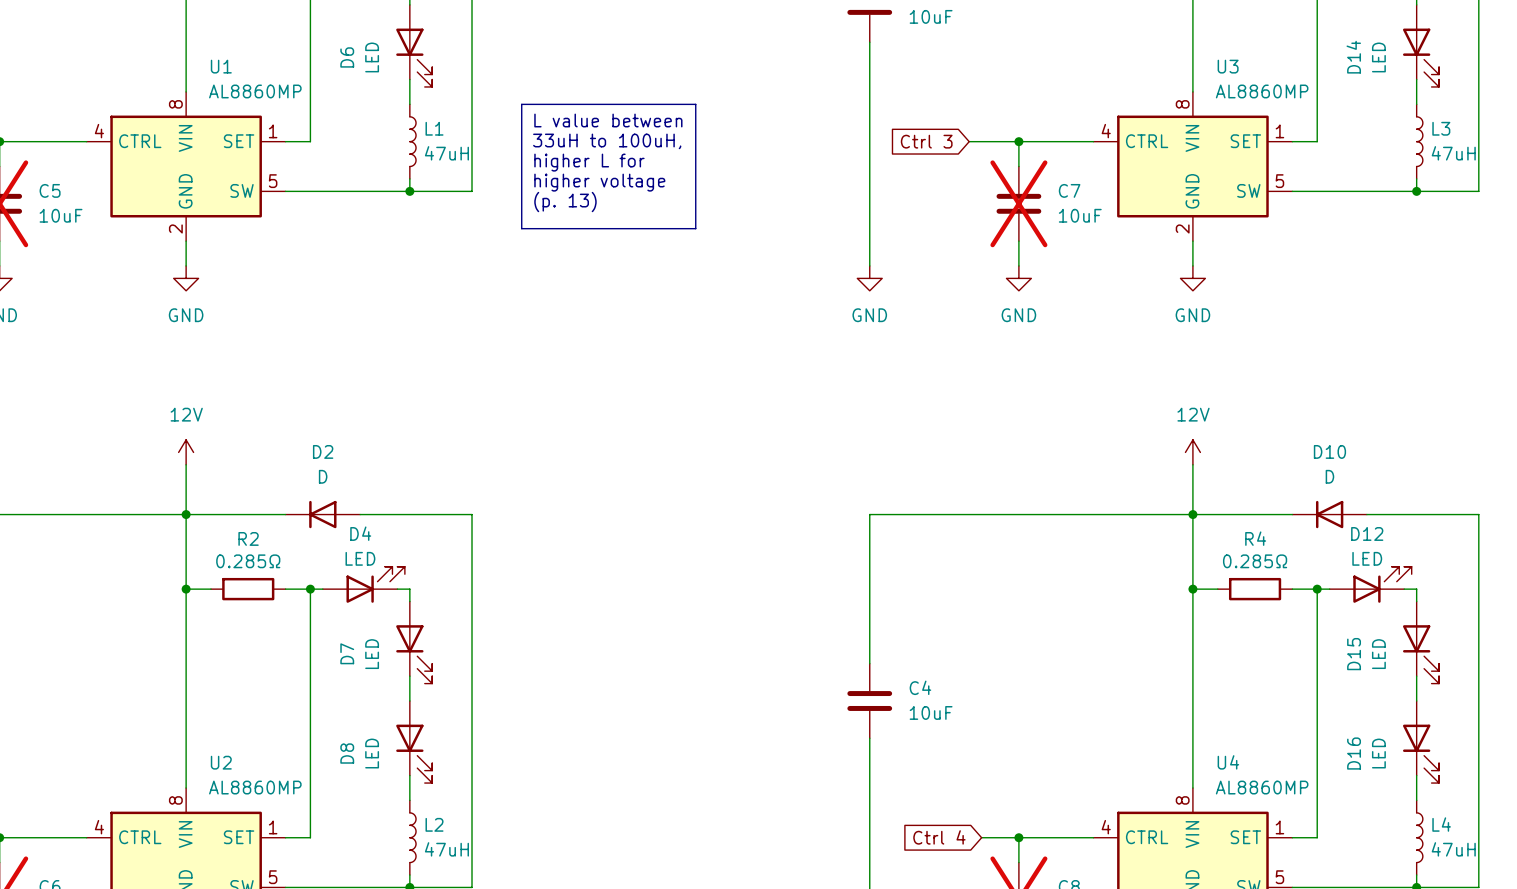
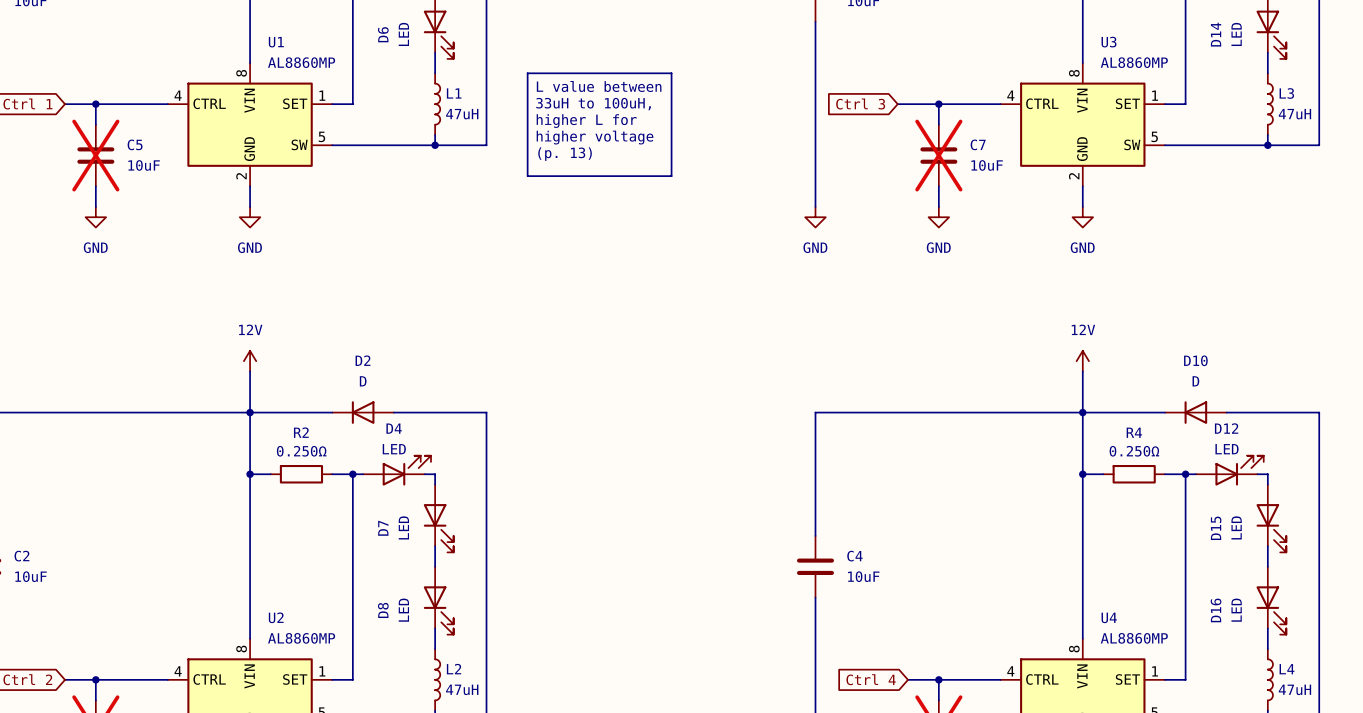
R2 value: 0.285Ω (248, 561) -> 0.250Ω (301, 451)
R4 value: 0.285Ω (1255, 561) -> 0.250Ω (1134, 451)

